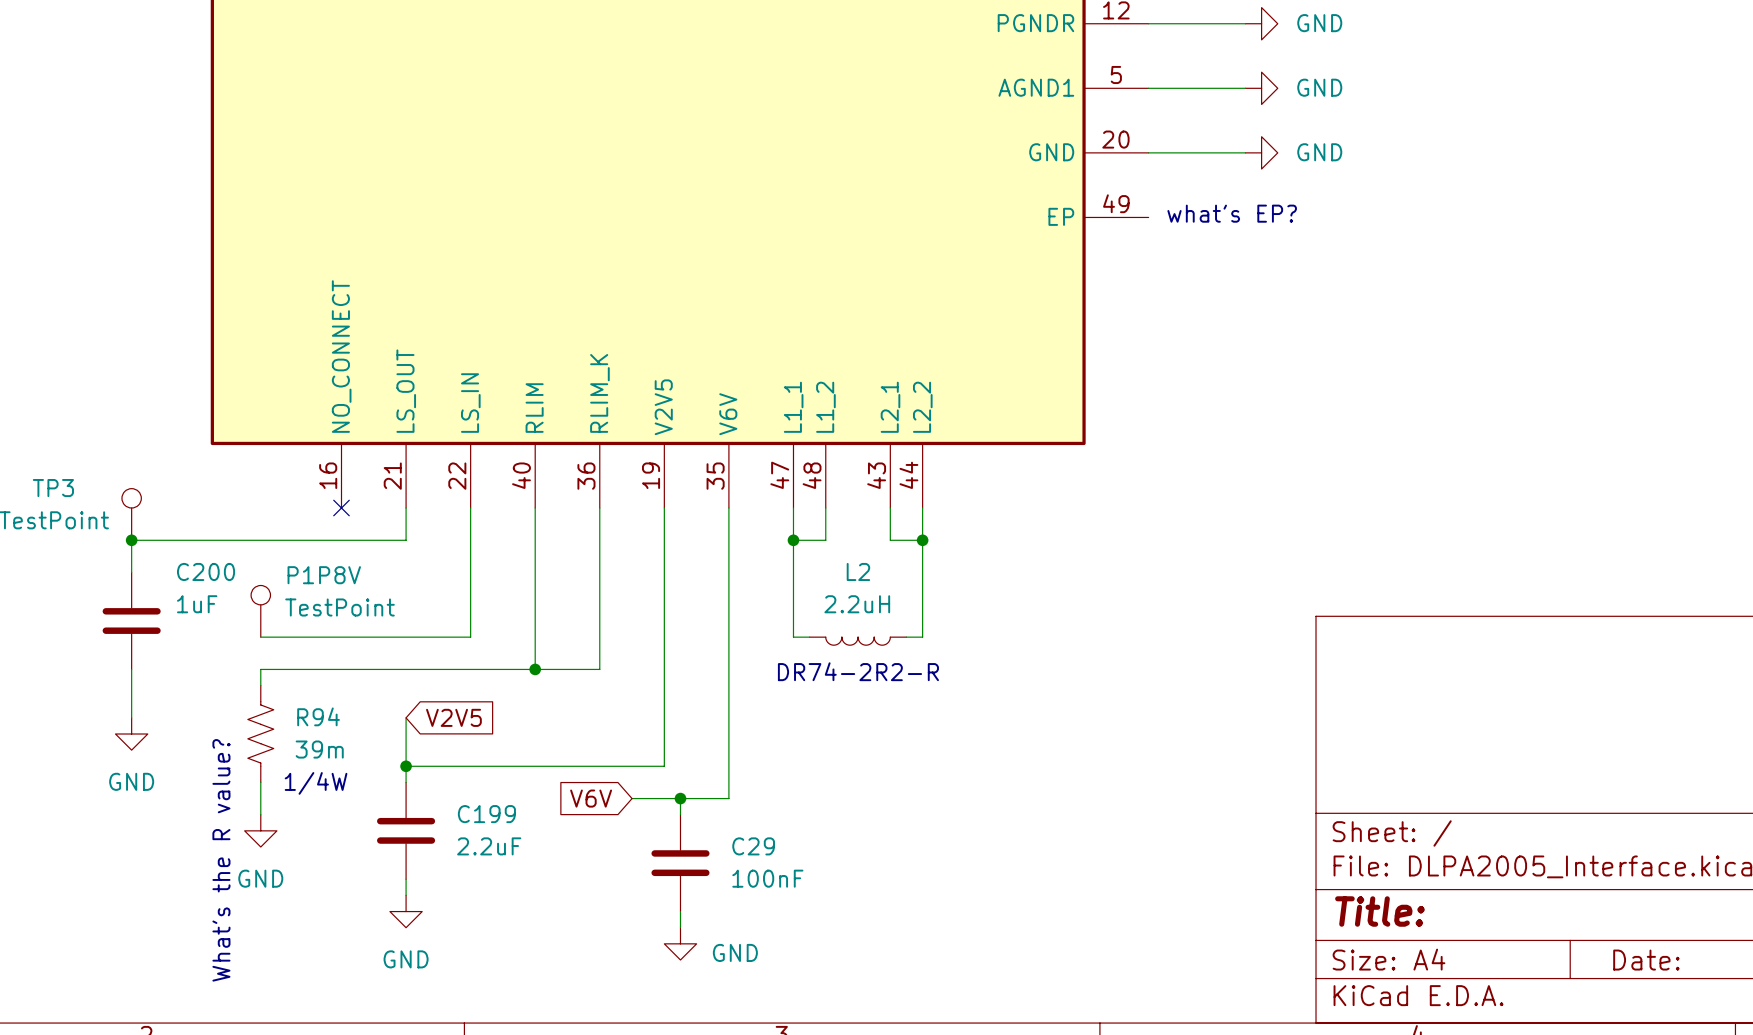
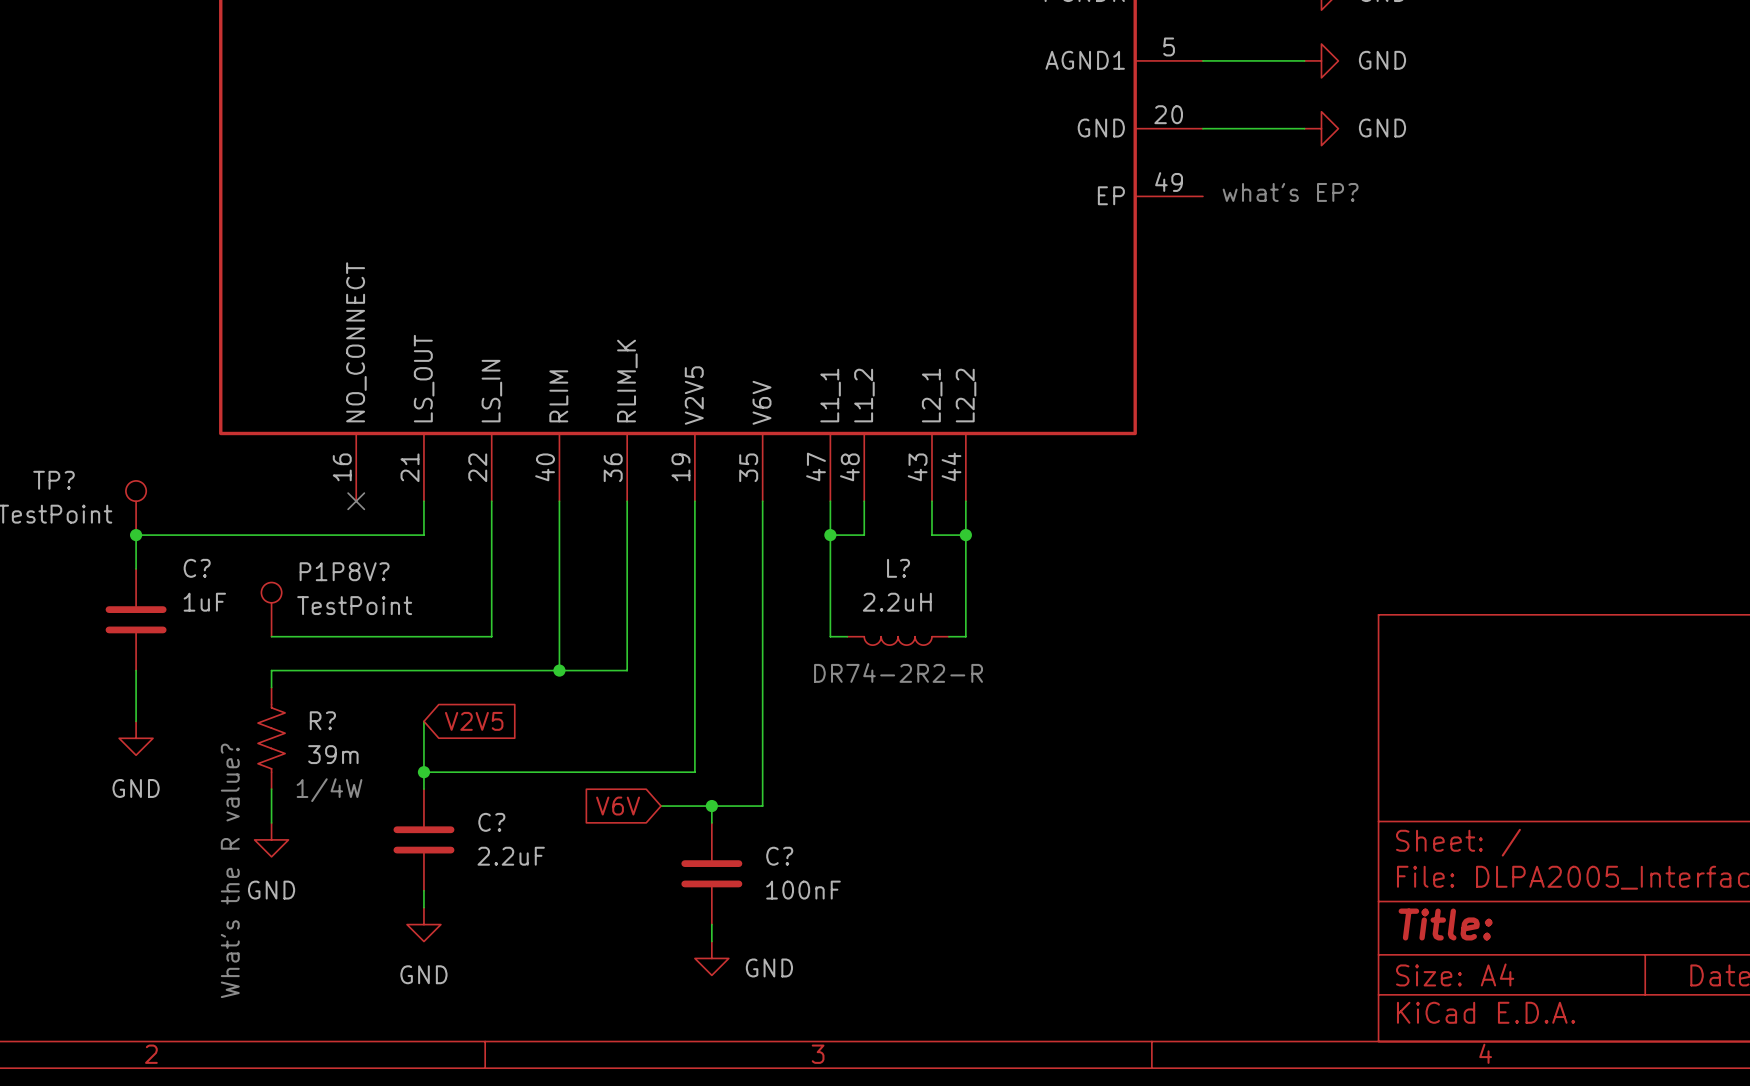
TP3 name: TP3 (53, 488) -> TP? (53, 480)
C200 name: C200 (206, 571) -> C? (197, 568)
L2 name: L2 (858, 571) -> L? (898, 568)
P1P8V name: P1P8V (324, 575) -> P1P8V? (344, 571)
R94 name: R94 (318, 716) -> R? (322, 720)
C199 name: C199 (486, 814) -> C? (491, 822)
C29 name: C29 (753, 846) -> C? (779, 856)

